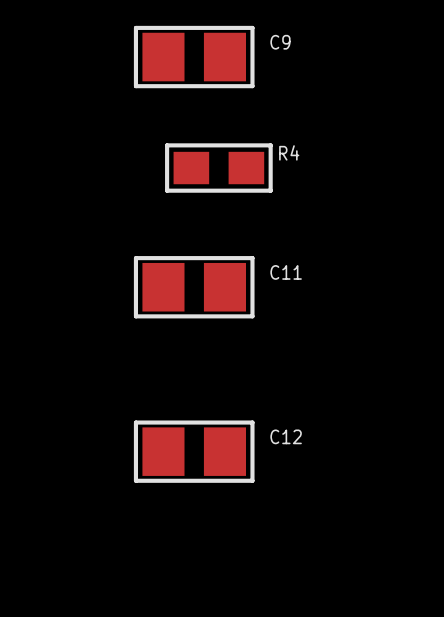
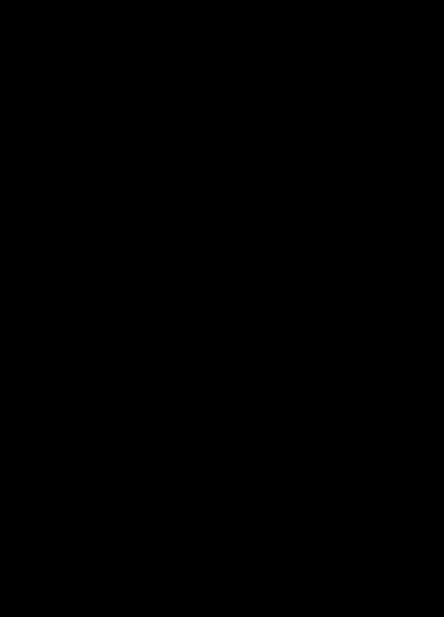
C9: (194, 57) -> none
R4: (218, 168) -> none
C11: (194, 287) -> none
C12: (194, 451) -> none

